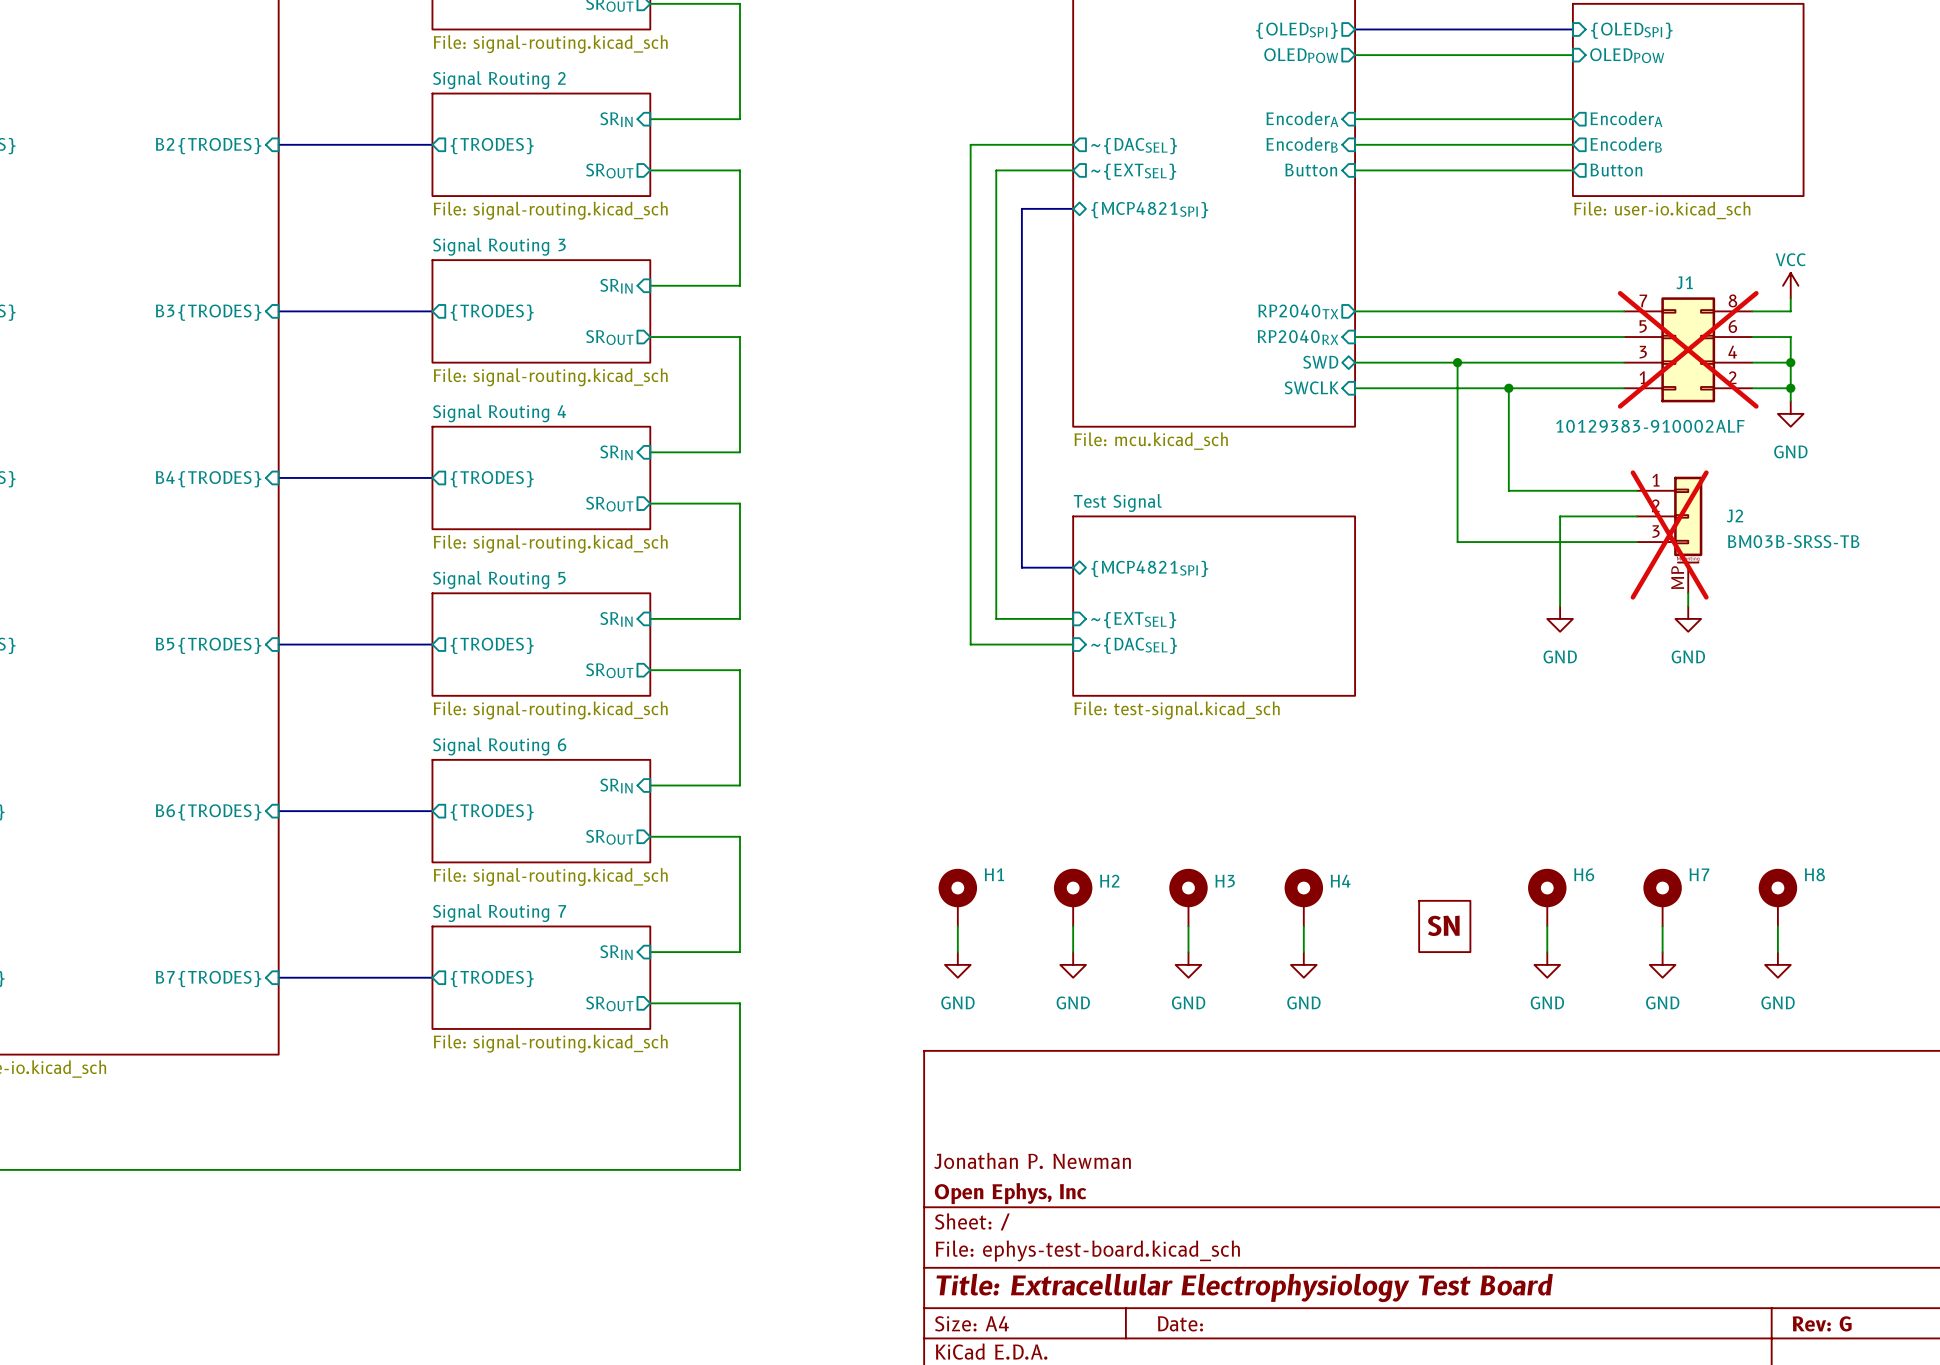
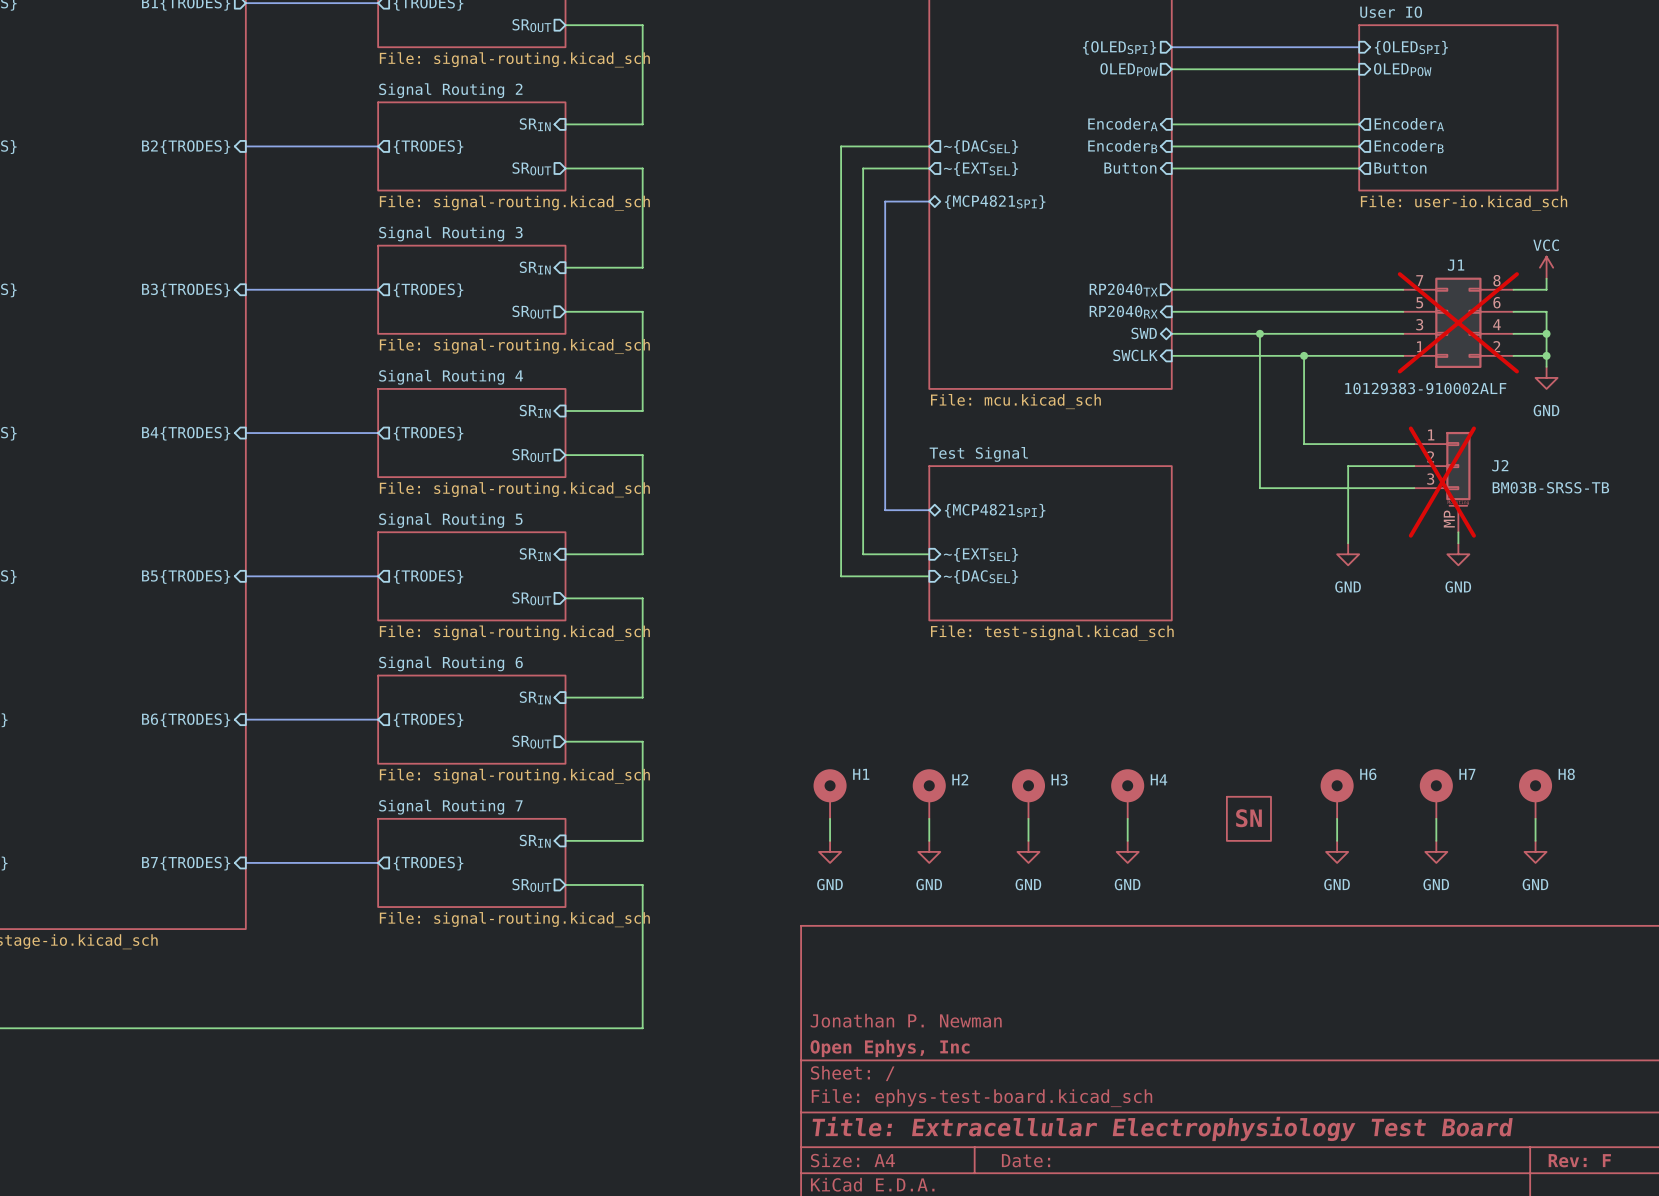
title block: Rev: G (1822, 1323) -> Rev: F (1579, 1160)

